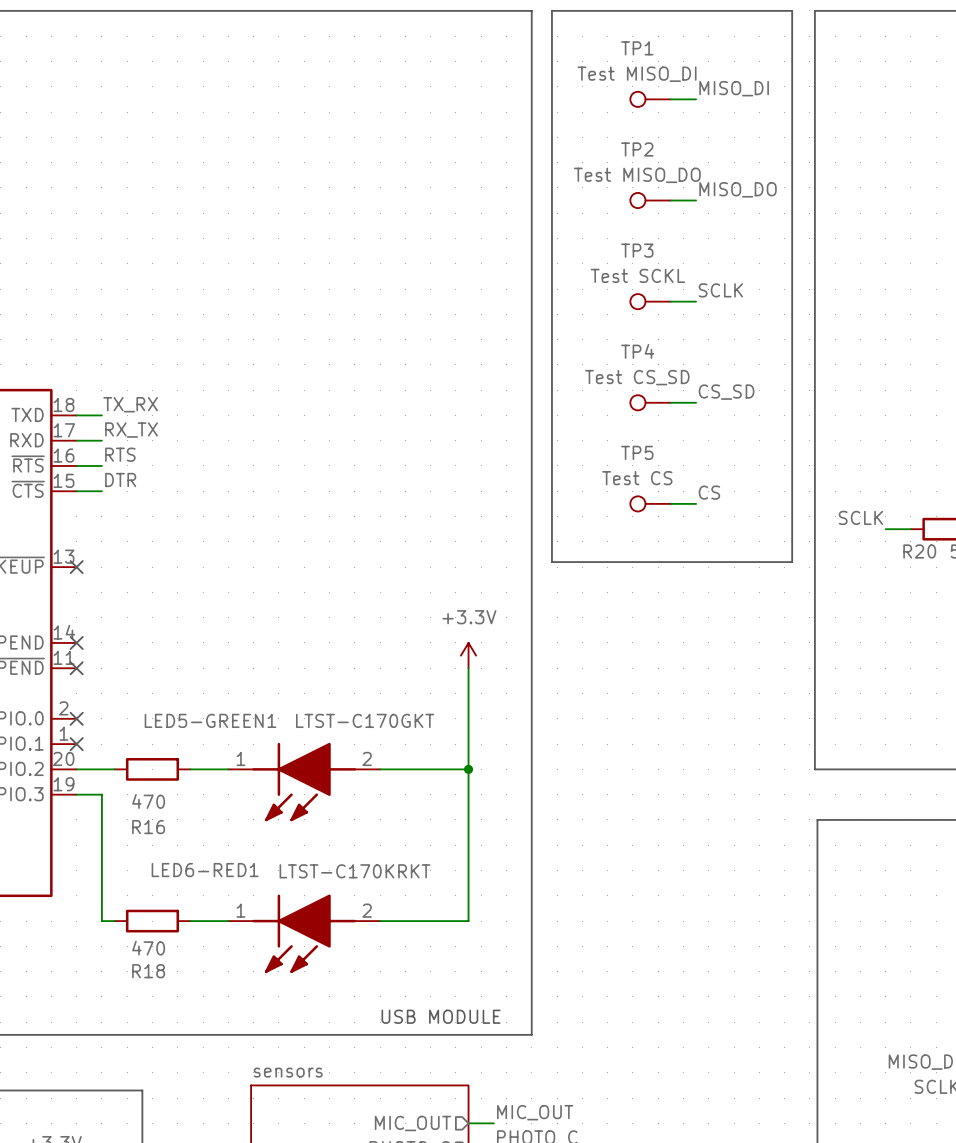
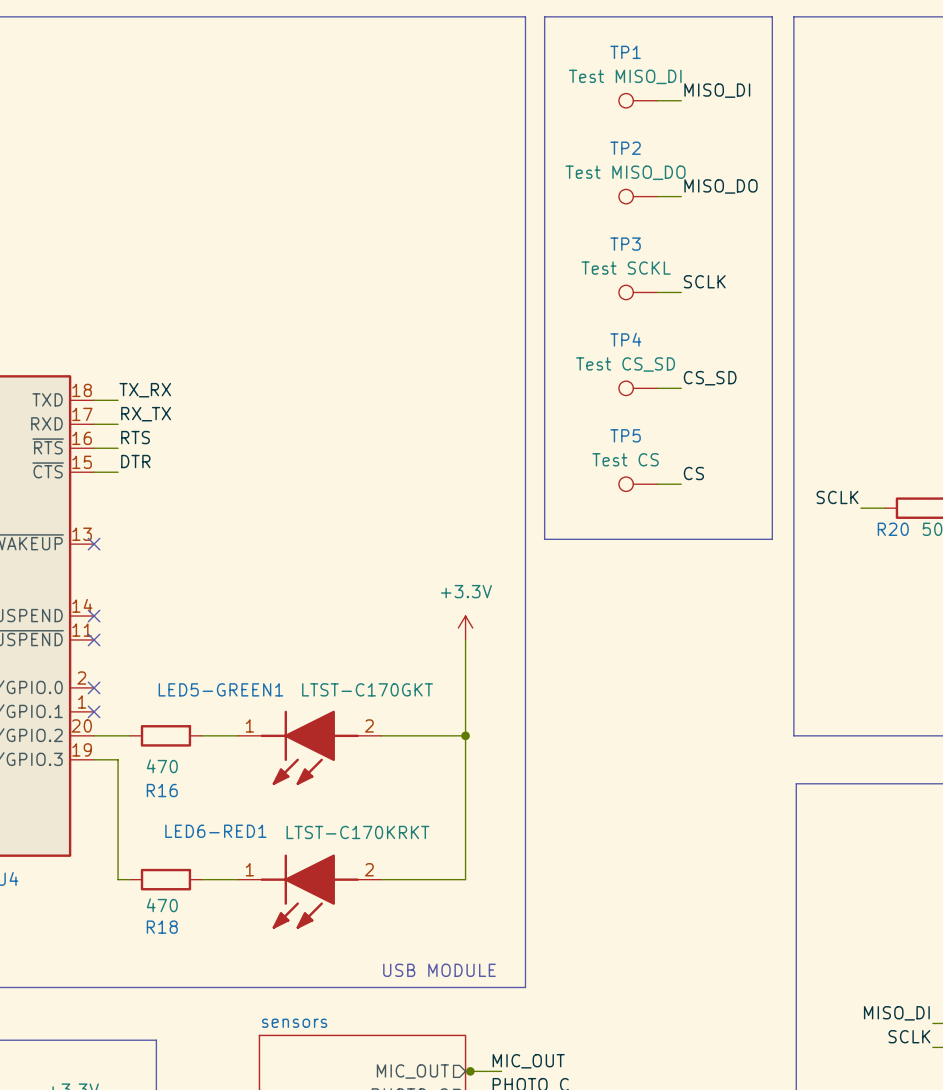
junction: none -> (470, 1071)
wire: none -> (489, 1071) (501, 1071)

